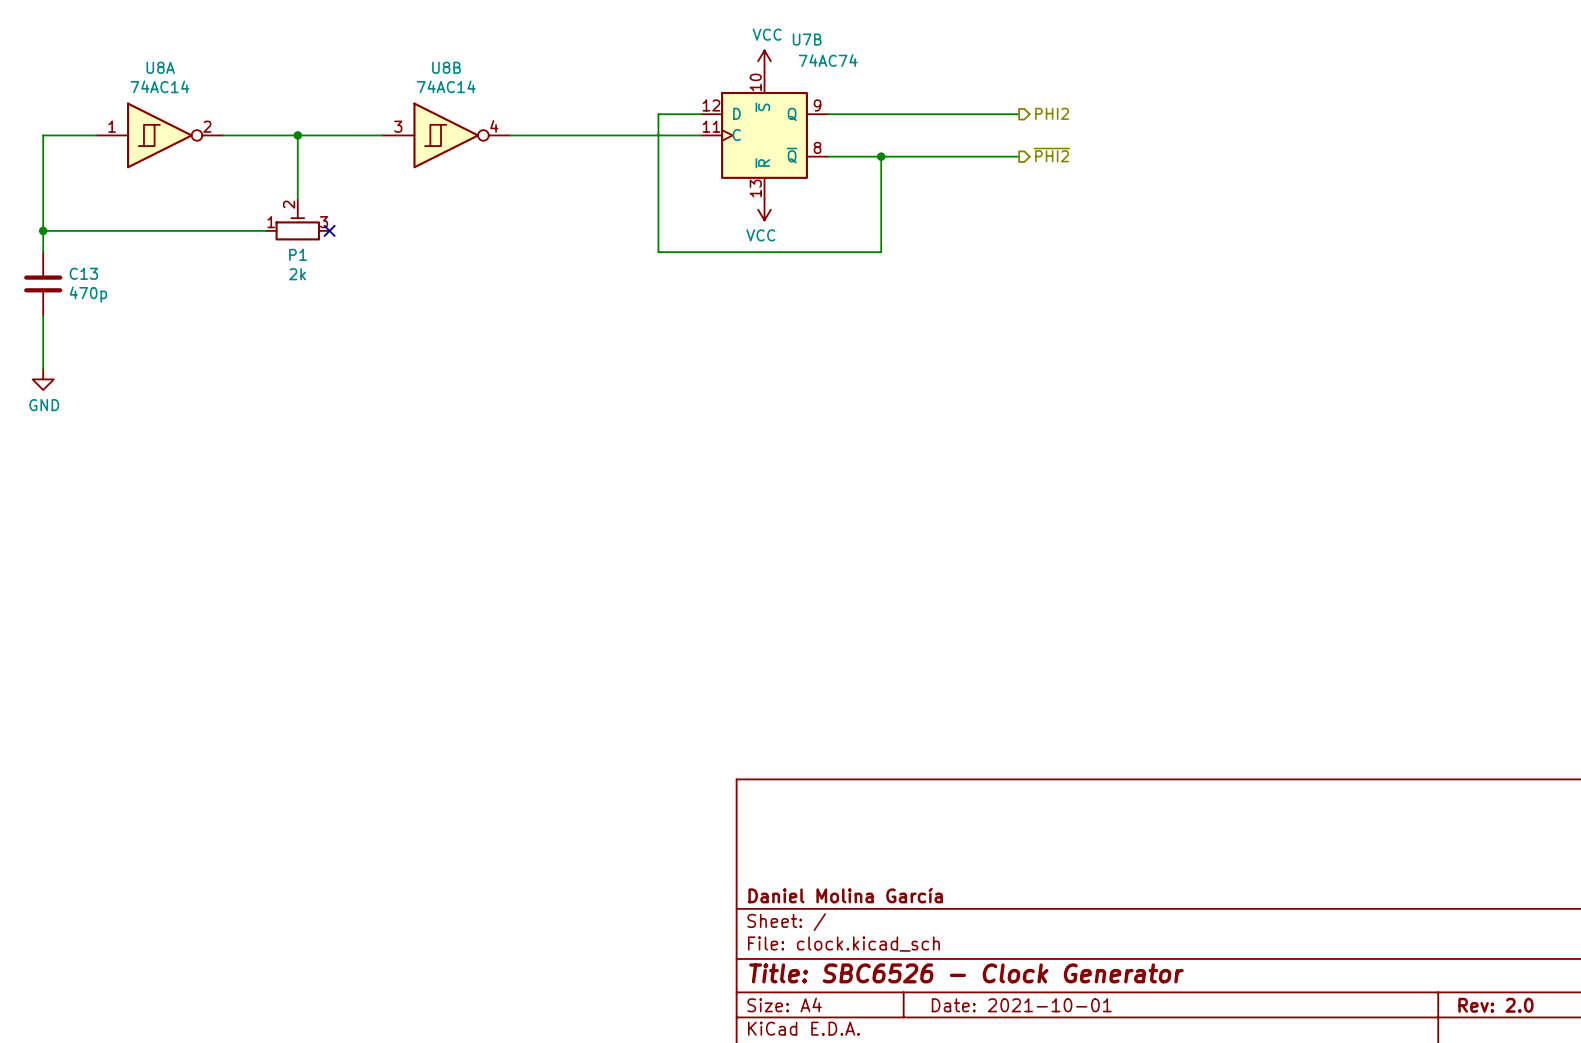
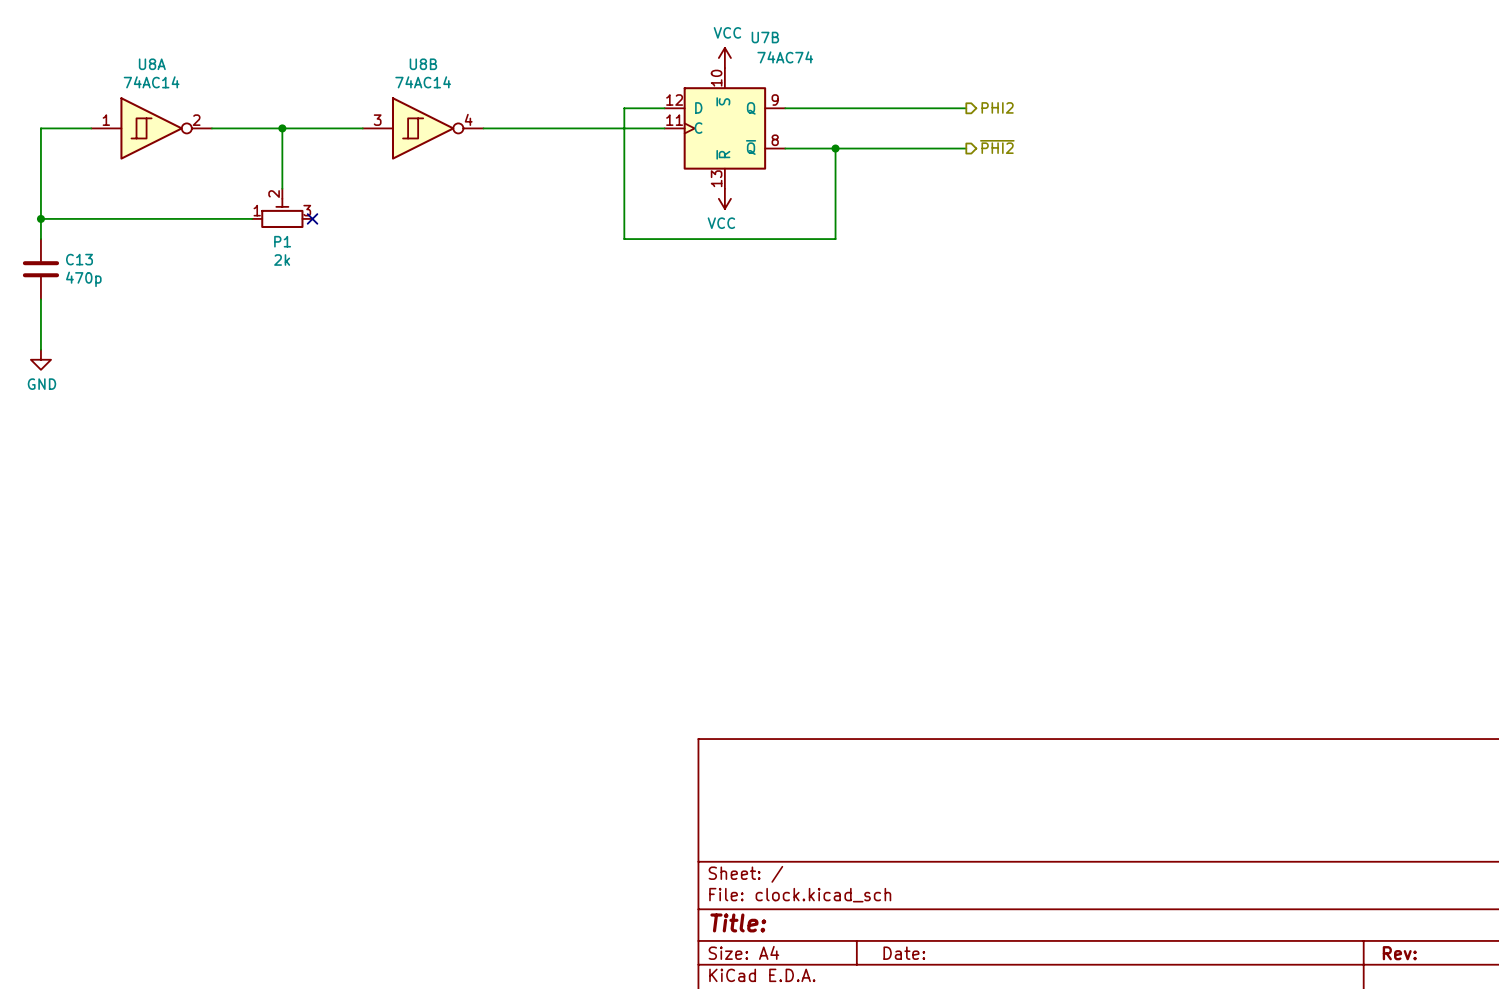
title block: Daniel Molina García (845, 895) -> none
title block: Title: SBC6526 - Clock Generator (966, 973) -> Title: (738, 922)
title block: Date: 2021-10-01 (1021, 1005) -> Date: (904, 953)
title block: Rev: 2.0 (1495, 1005) -> Rev: (1399, 953)

